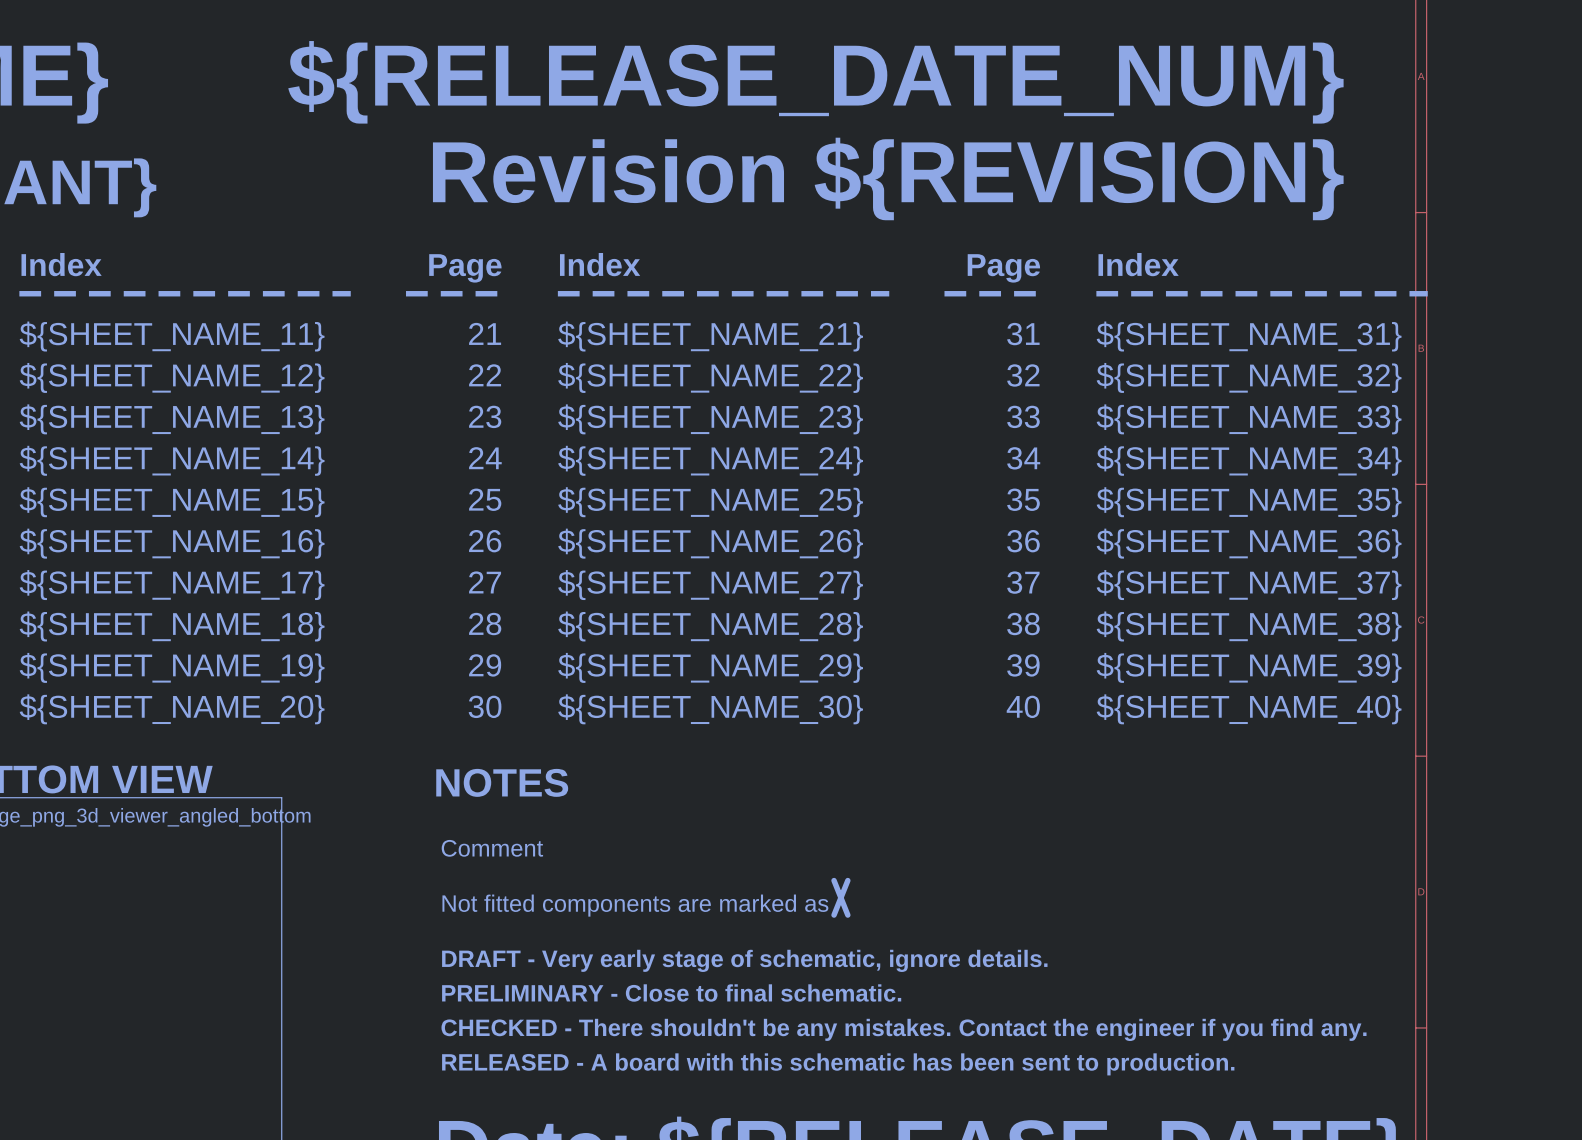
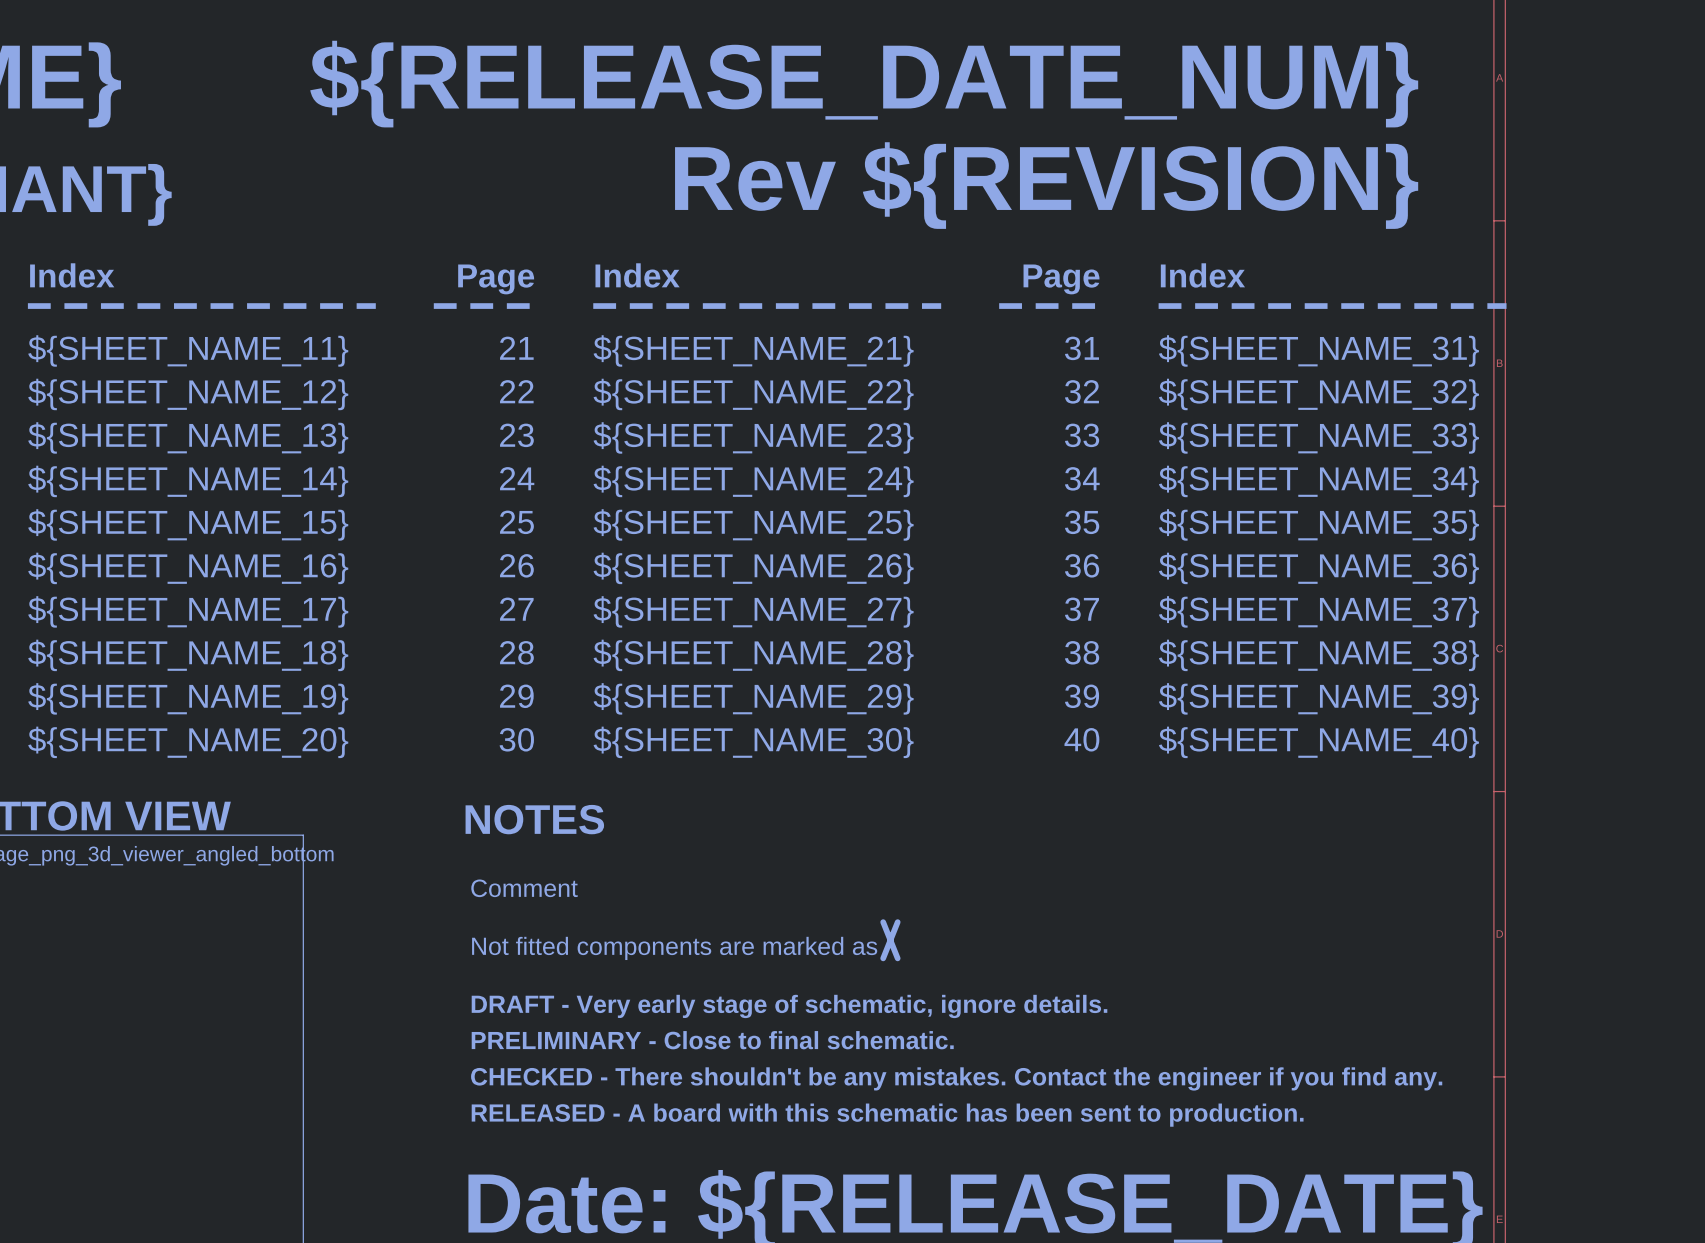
text: Revision ${REVISION} (888, 178) -> Rev ${REVISION} (1046, 185)

